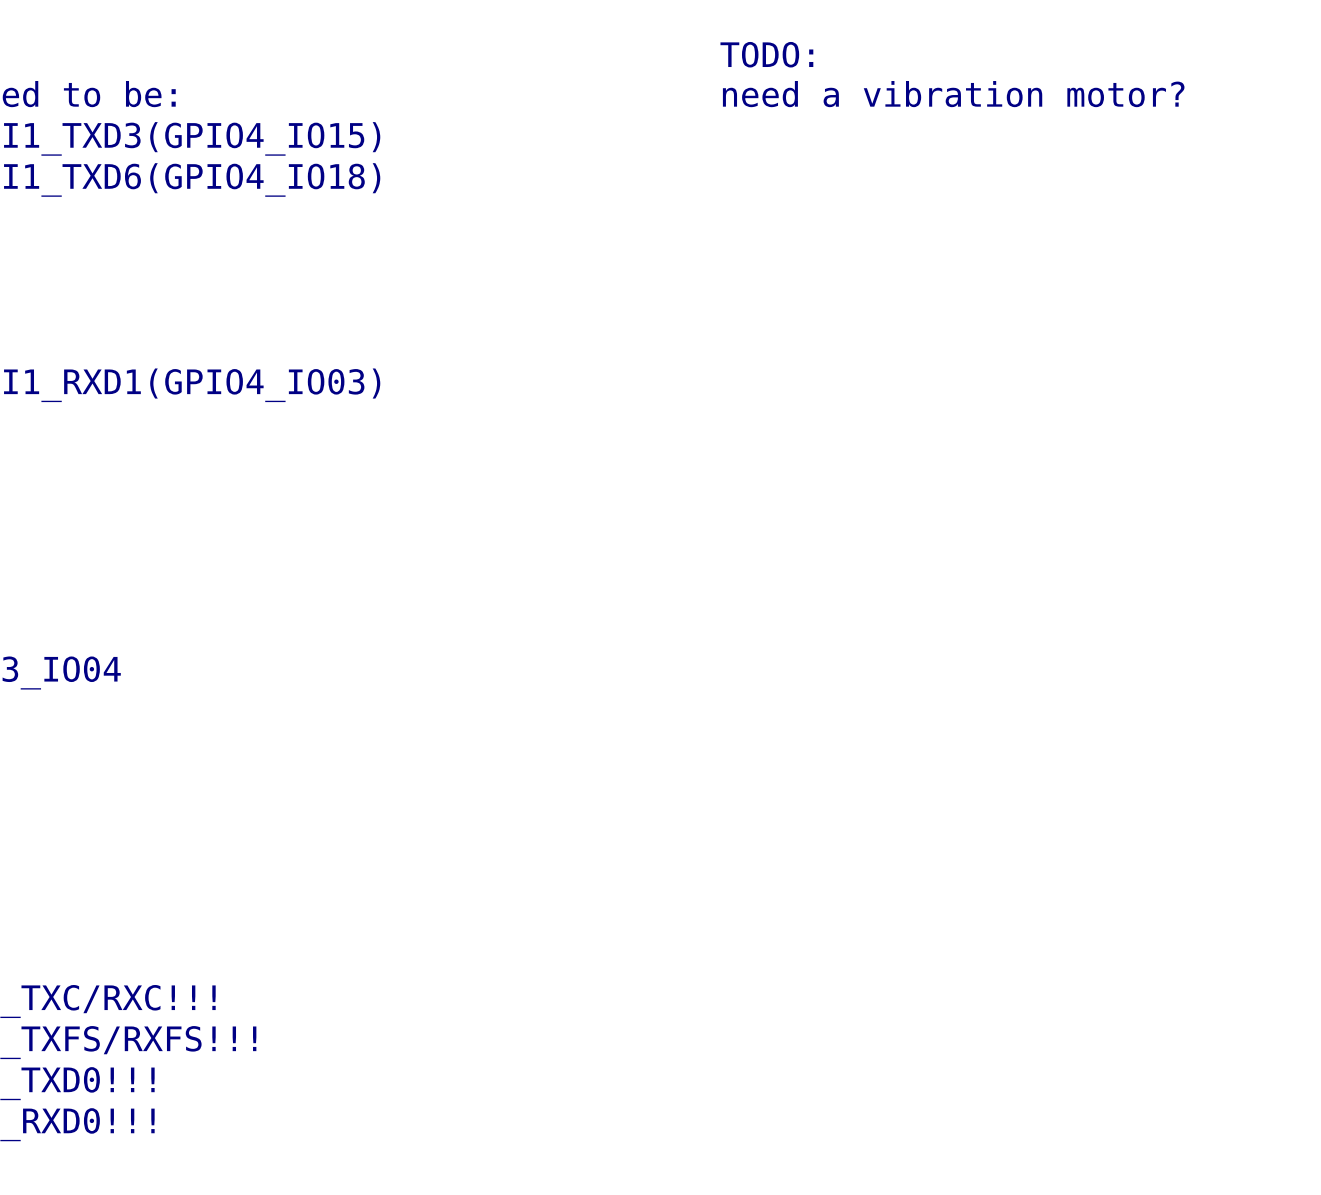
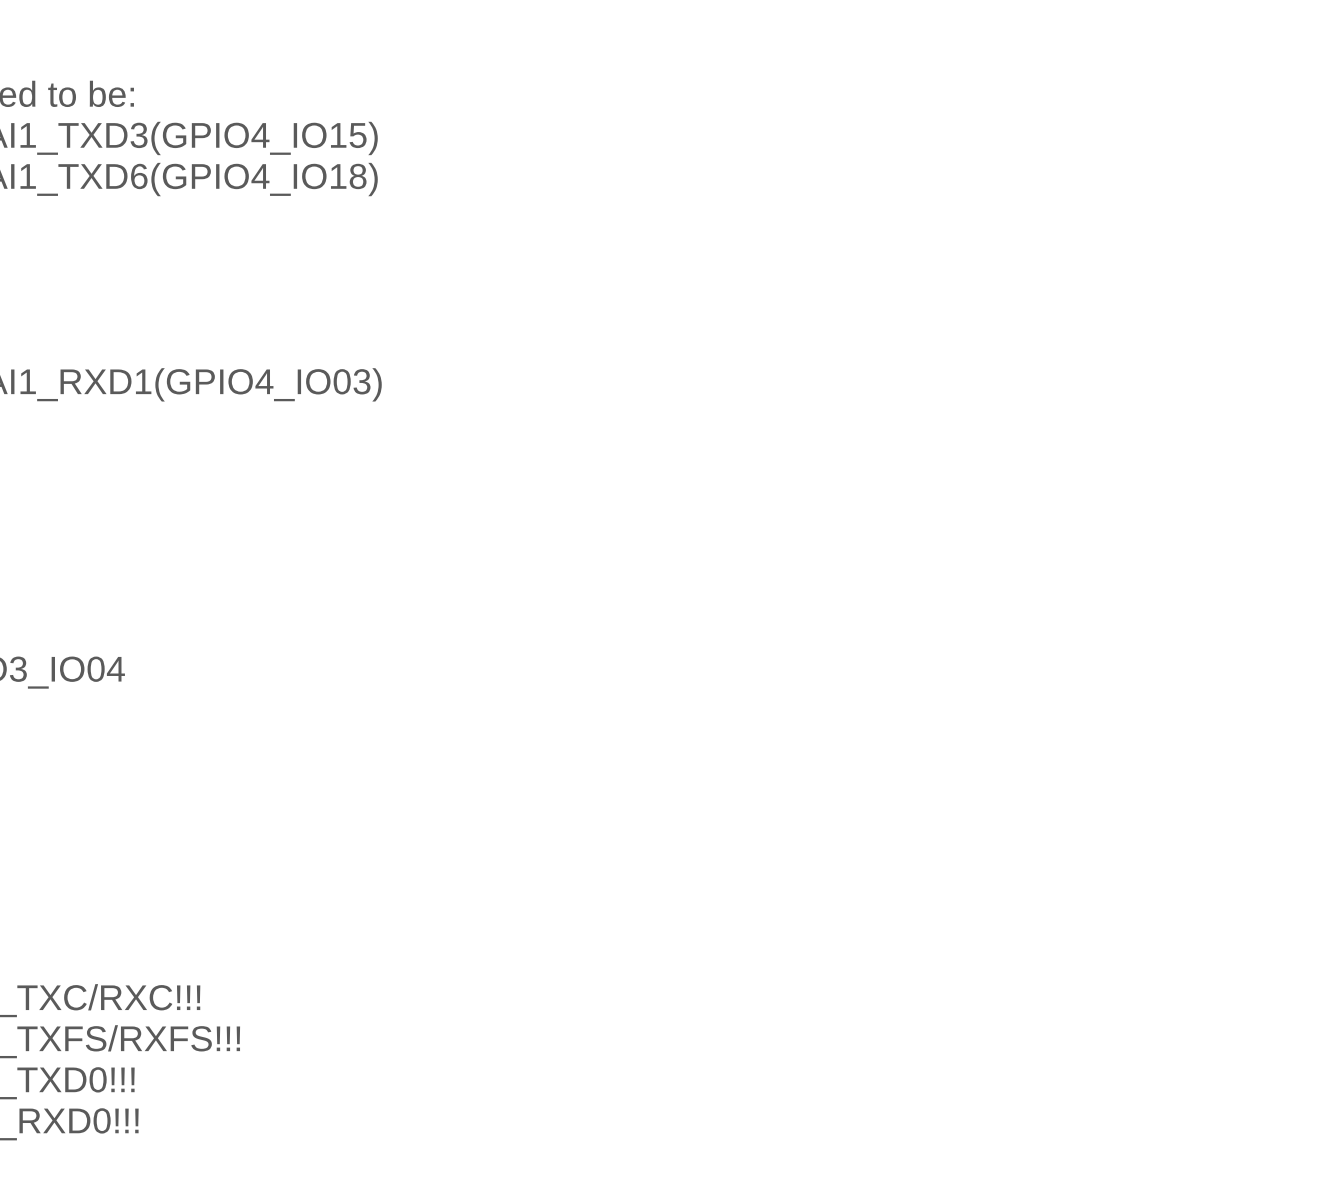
text: TODO: (766, 54) -> none
text: need a vibration motor? (953, 94) -> none

